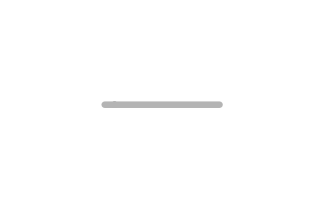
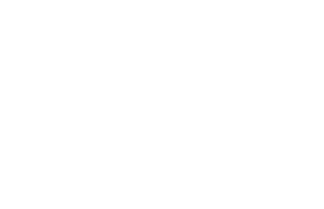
track: (219, 104) (104, 104) -> none

